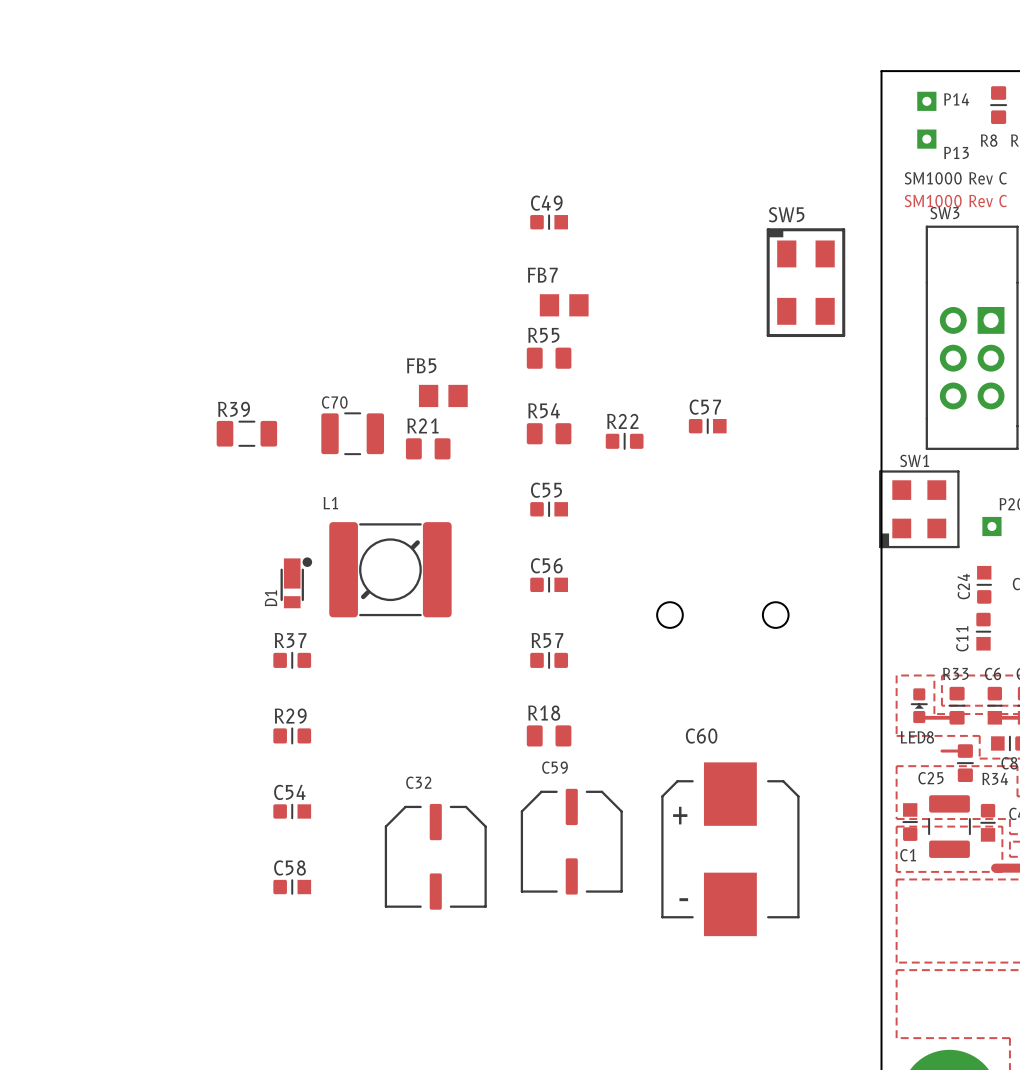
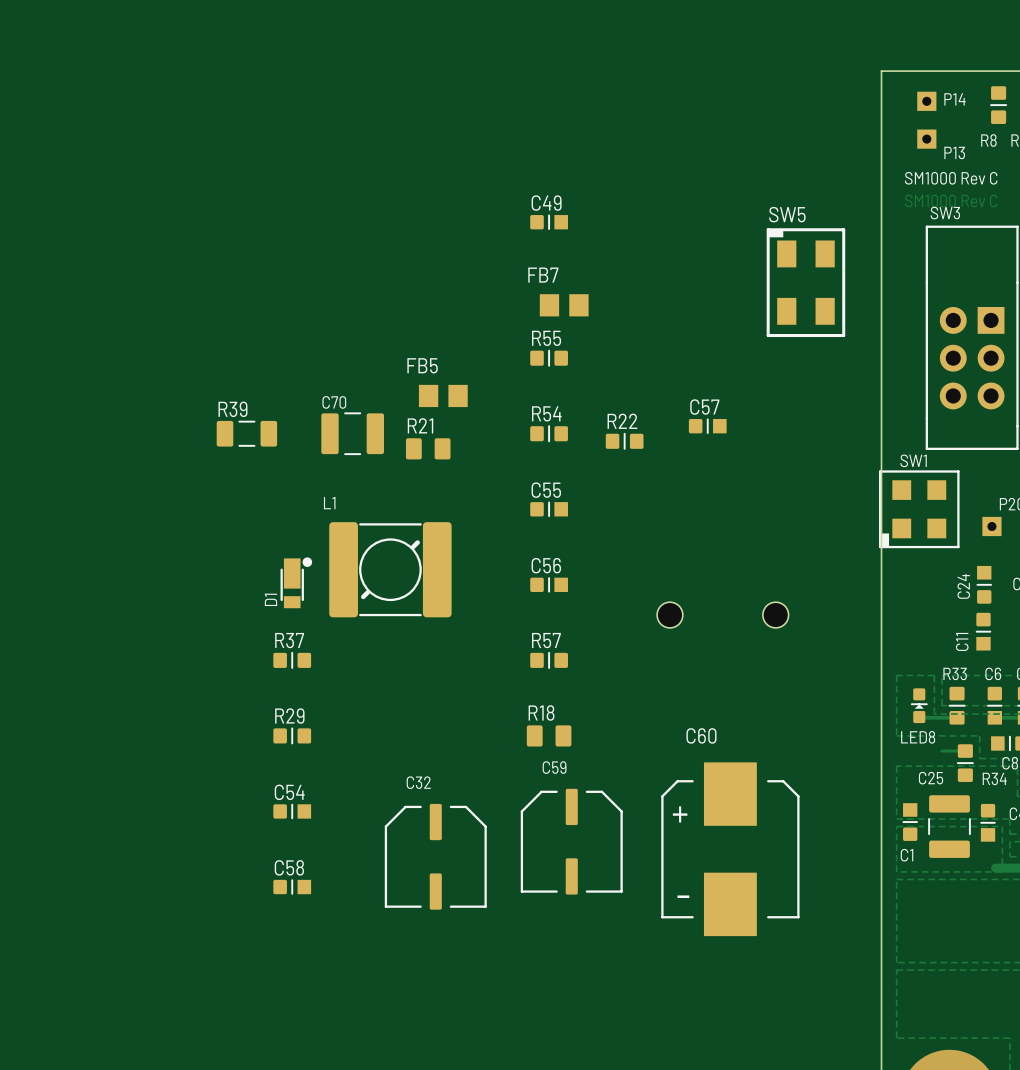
R55 footprint: [526, 347, 572, 369] -> [530, 349, 568, 367]
R54 footprint: [526, 423, 572, 445] -> [530, 425, 568, 443]

